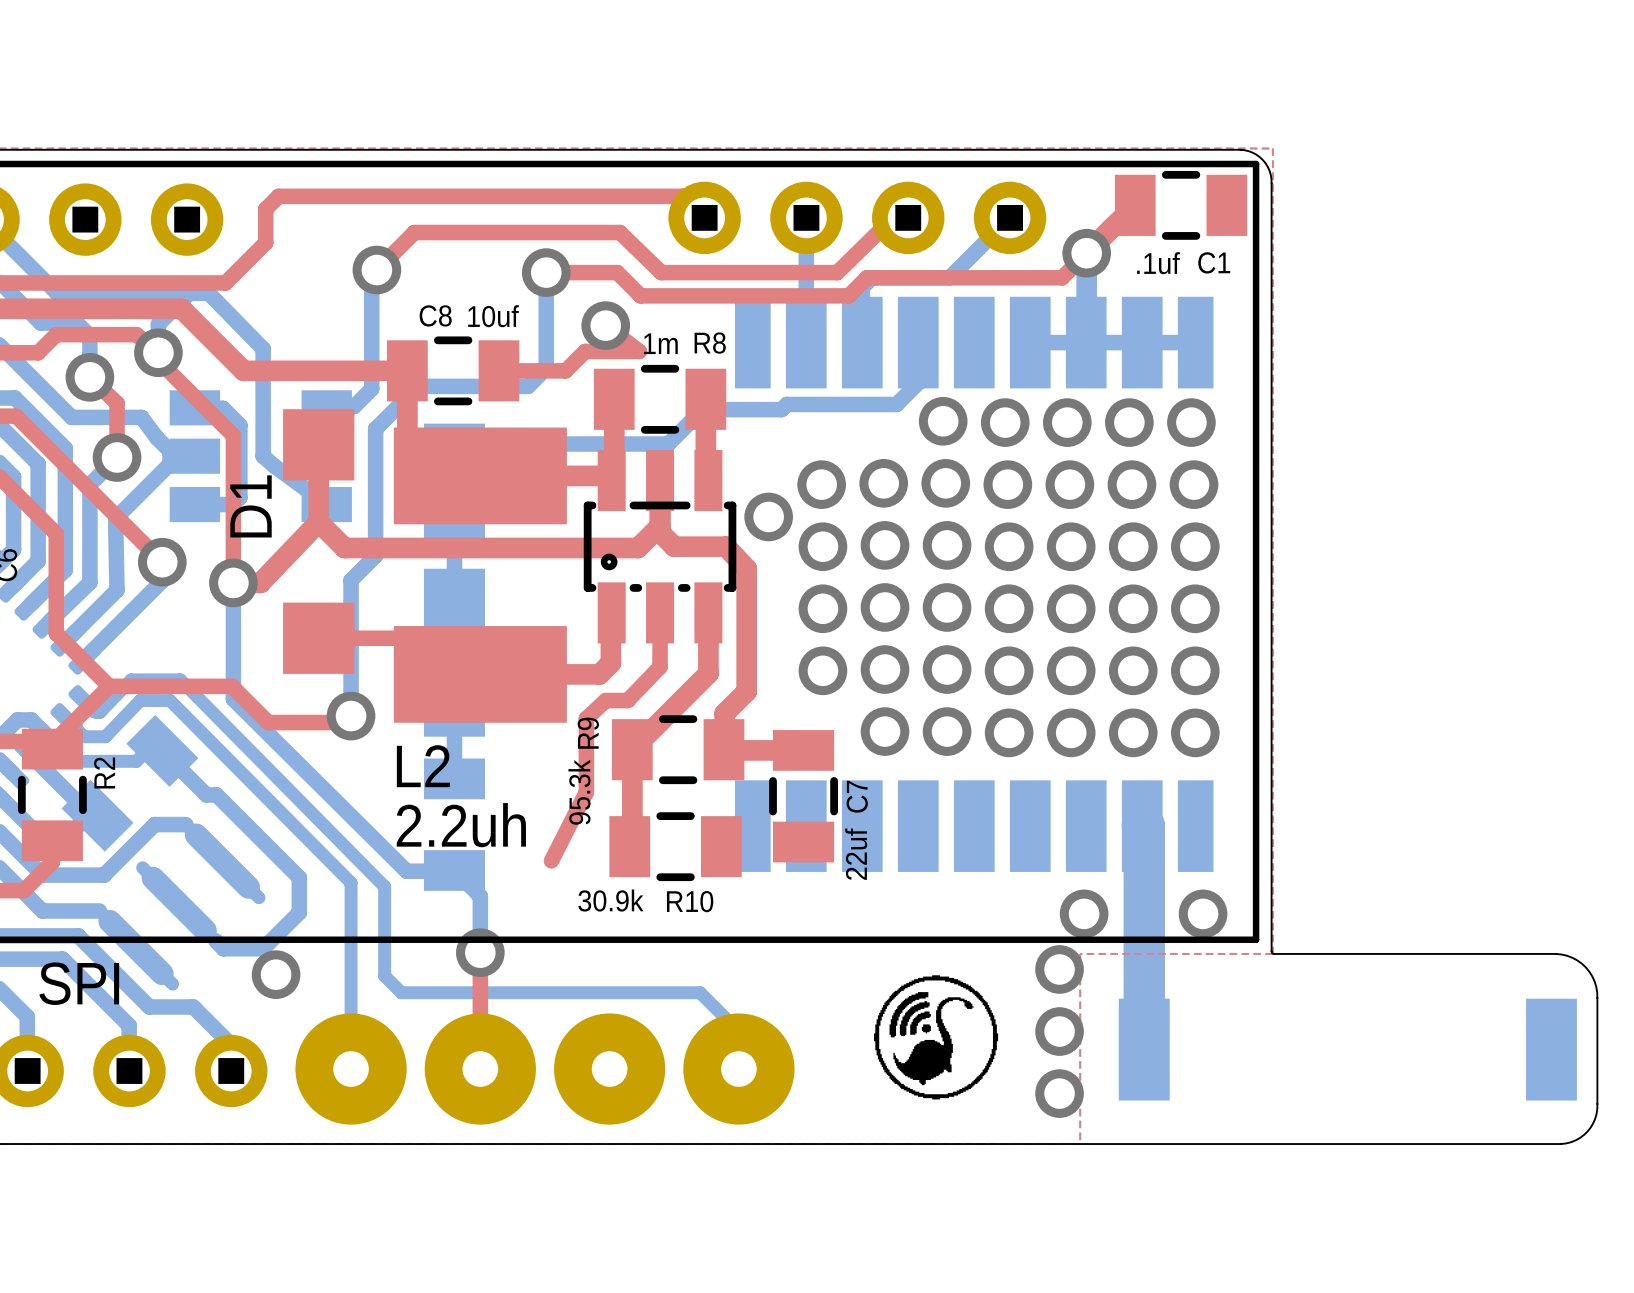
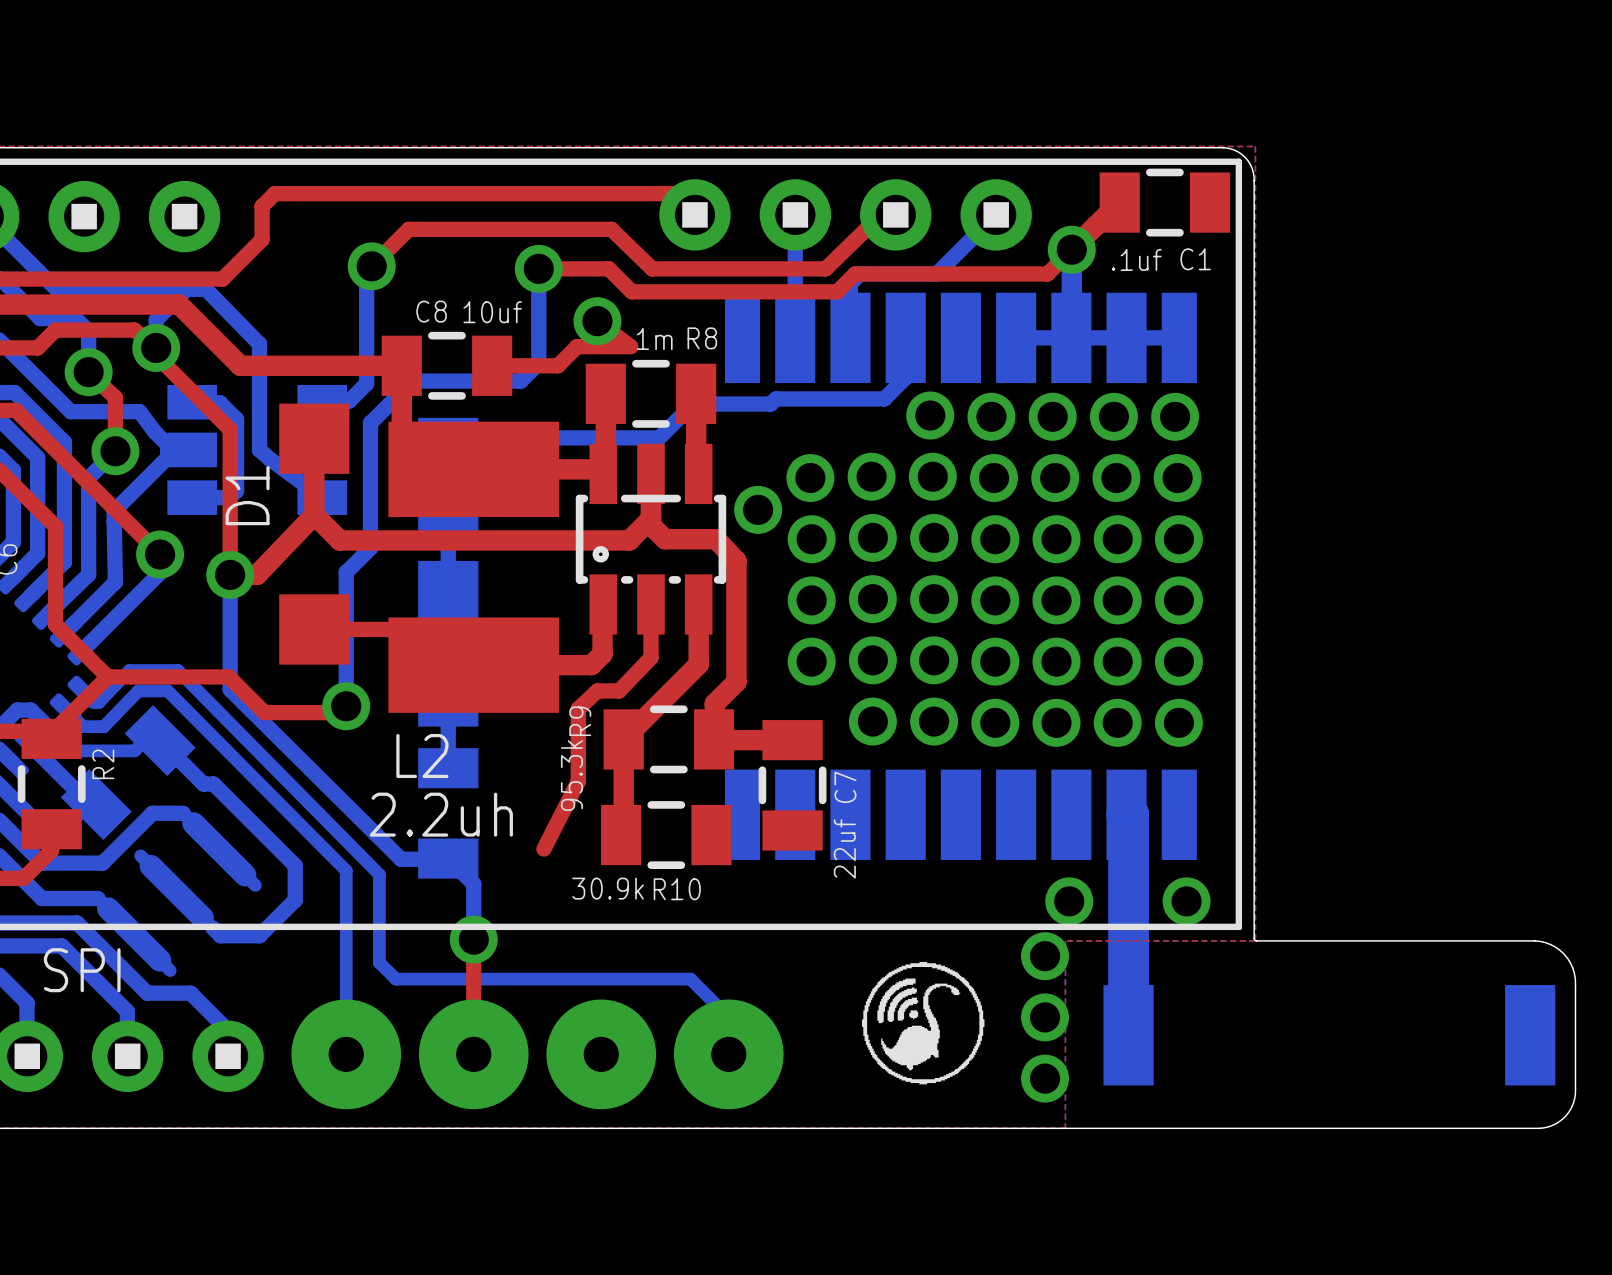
via: (276, 974) -> none

